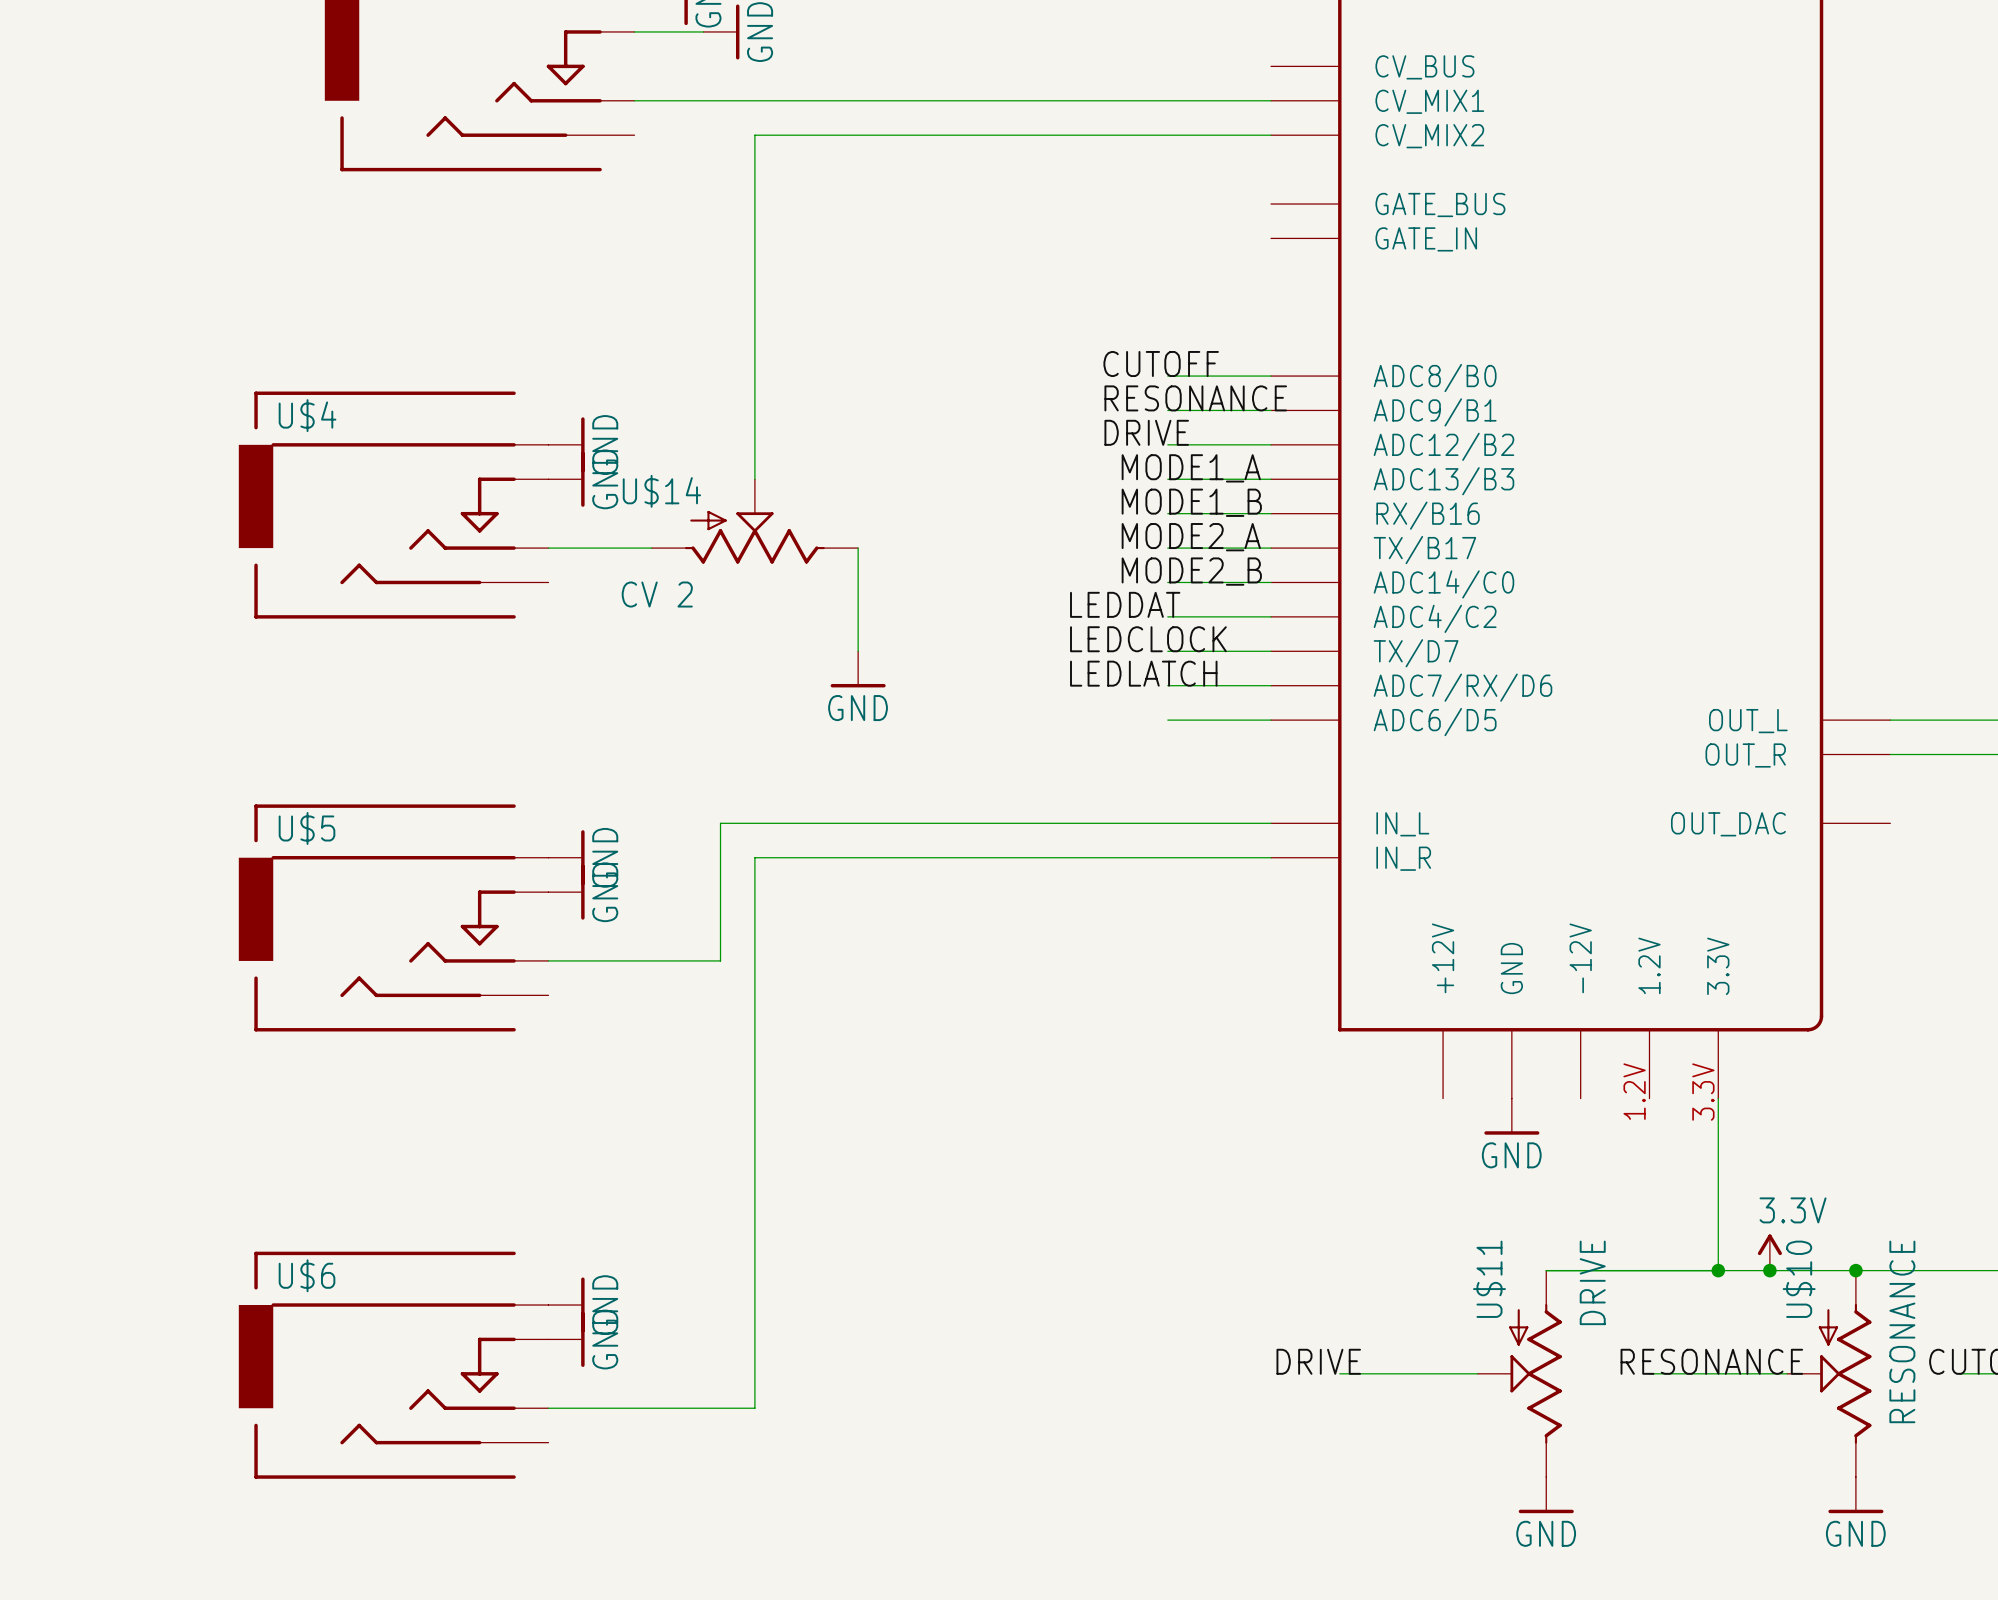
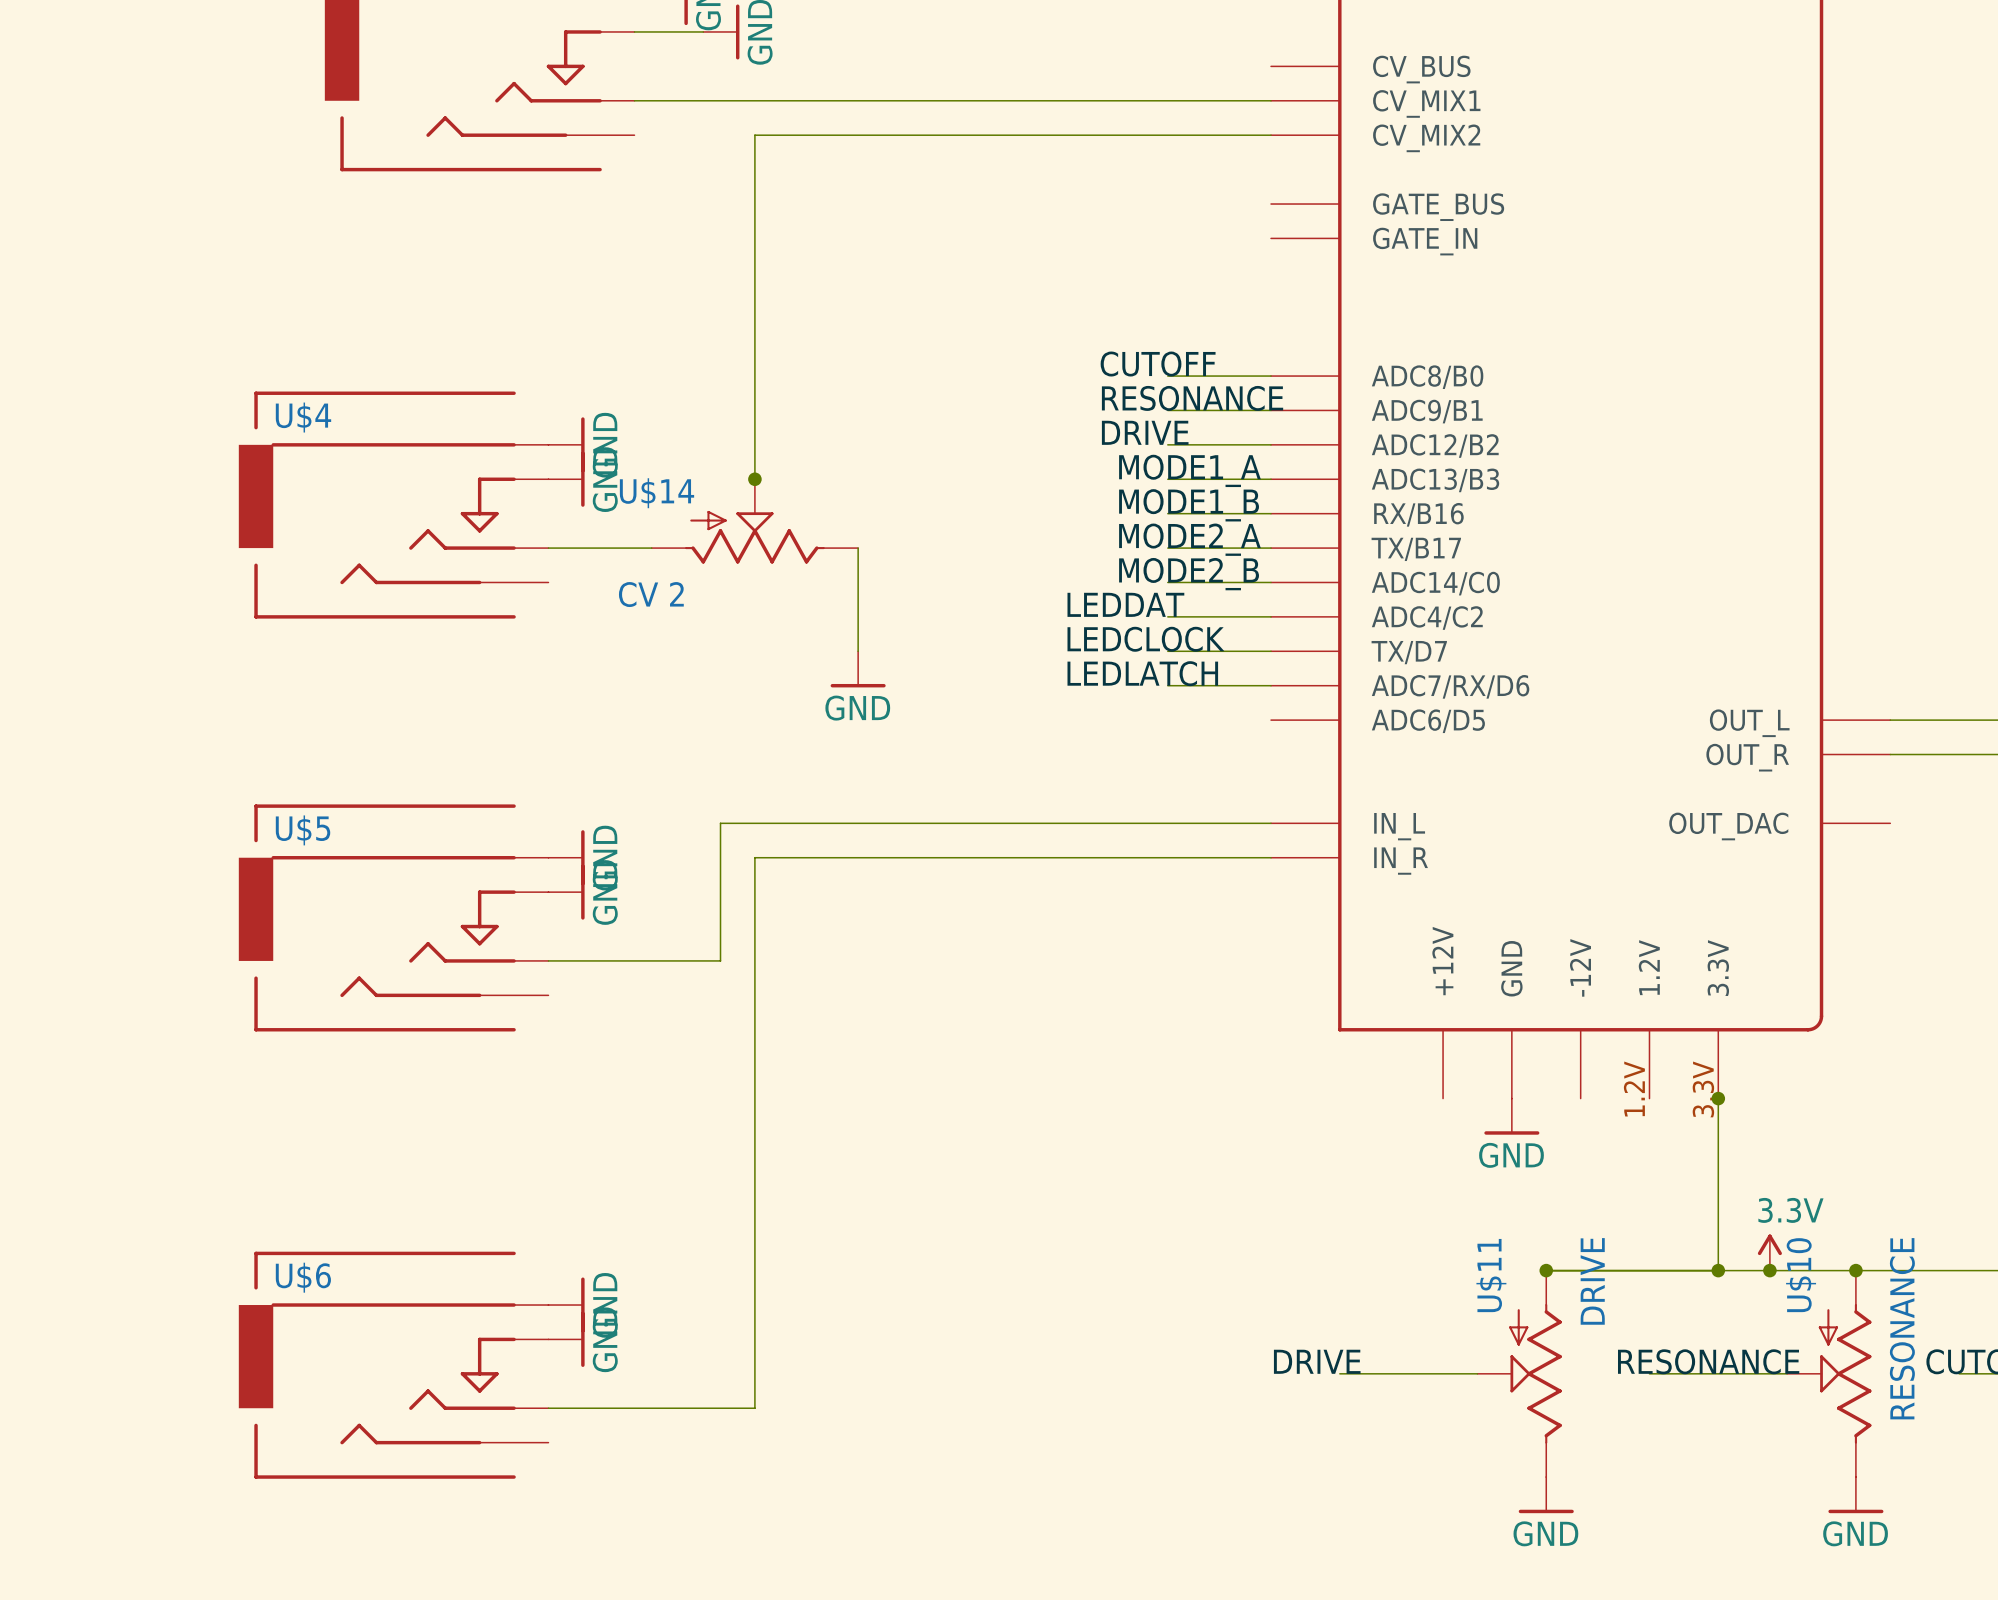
junction: none -> (754, 479)
wire: (1167, 720) (1271, 720) -> none
junction: none -> (1718, 1098)
junction: none -> (1546, 1270)

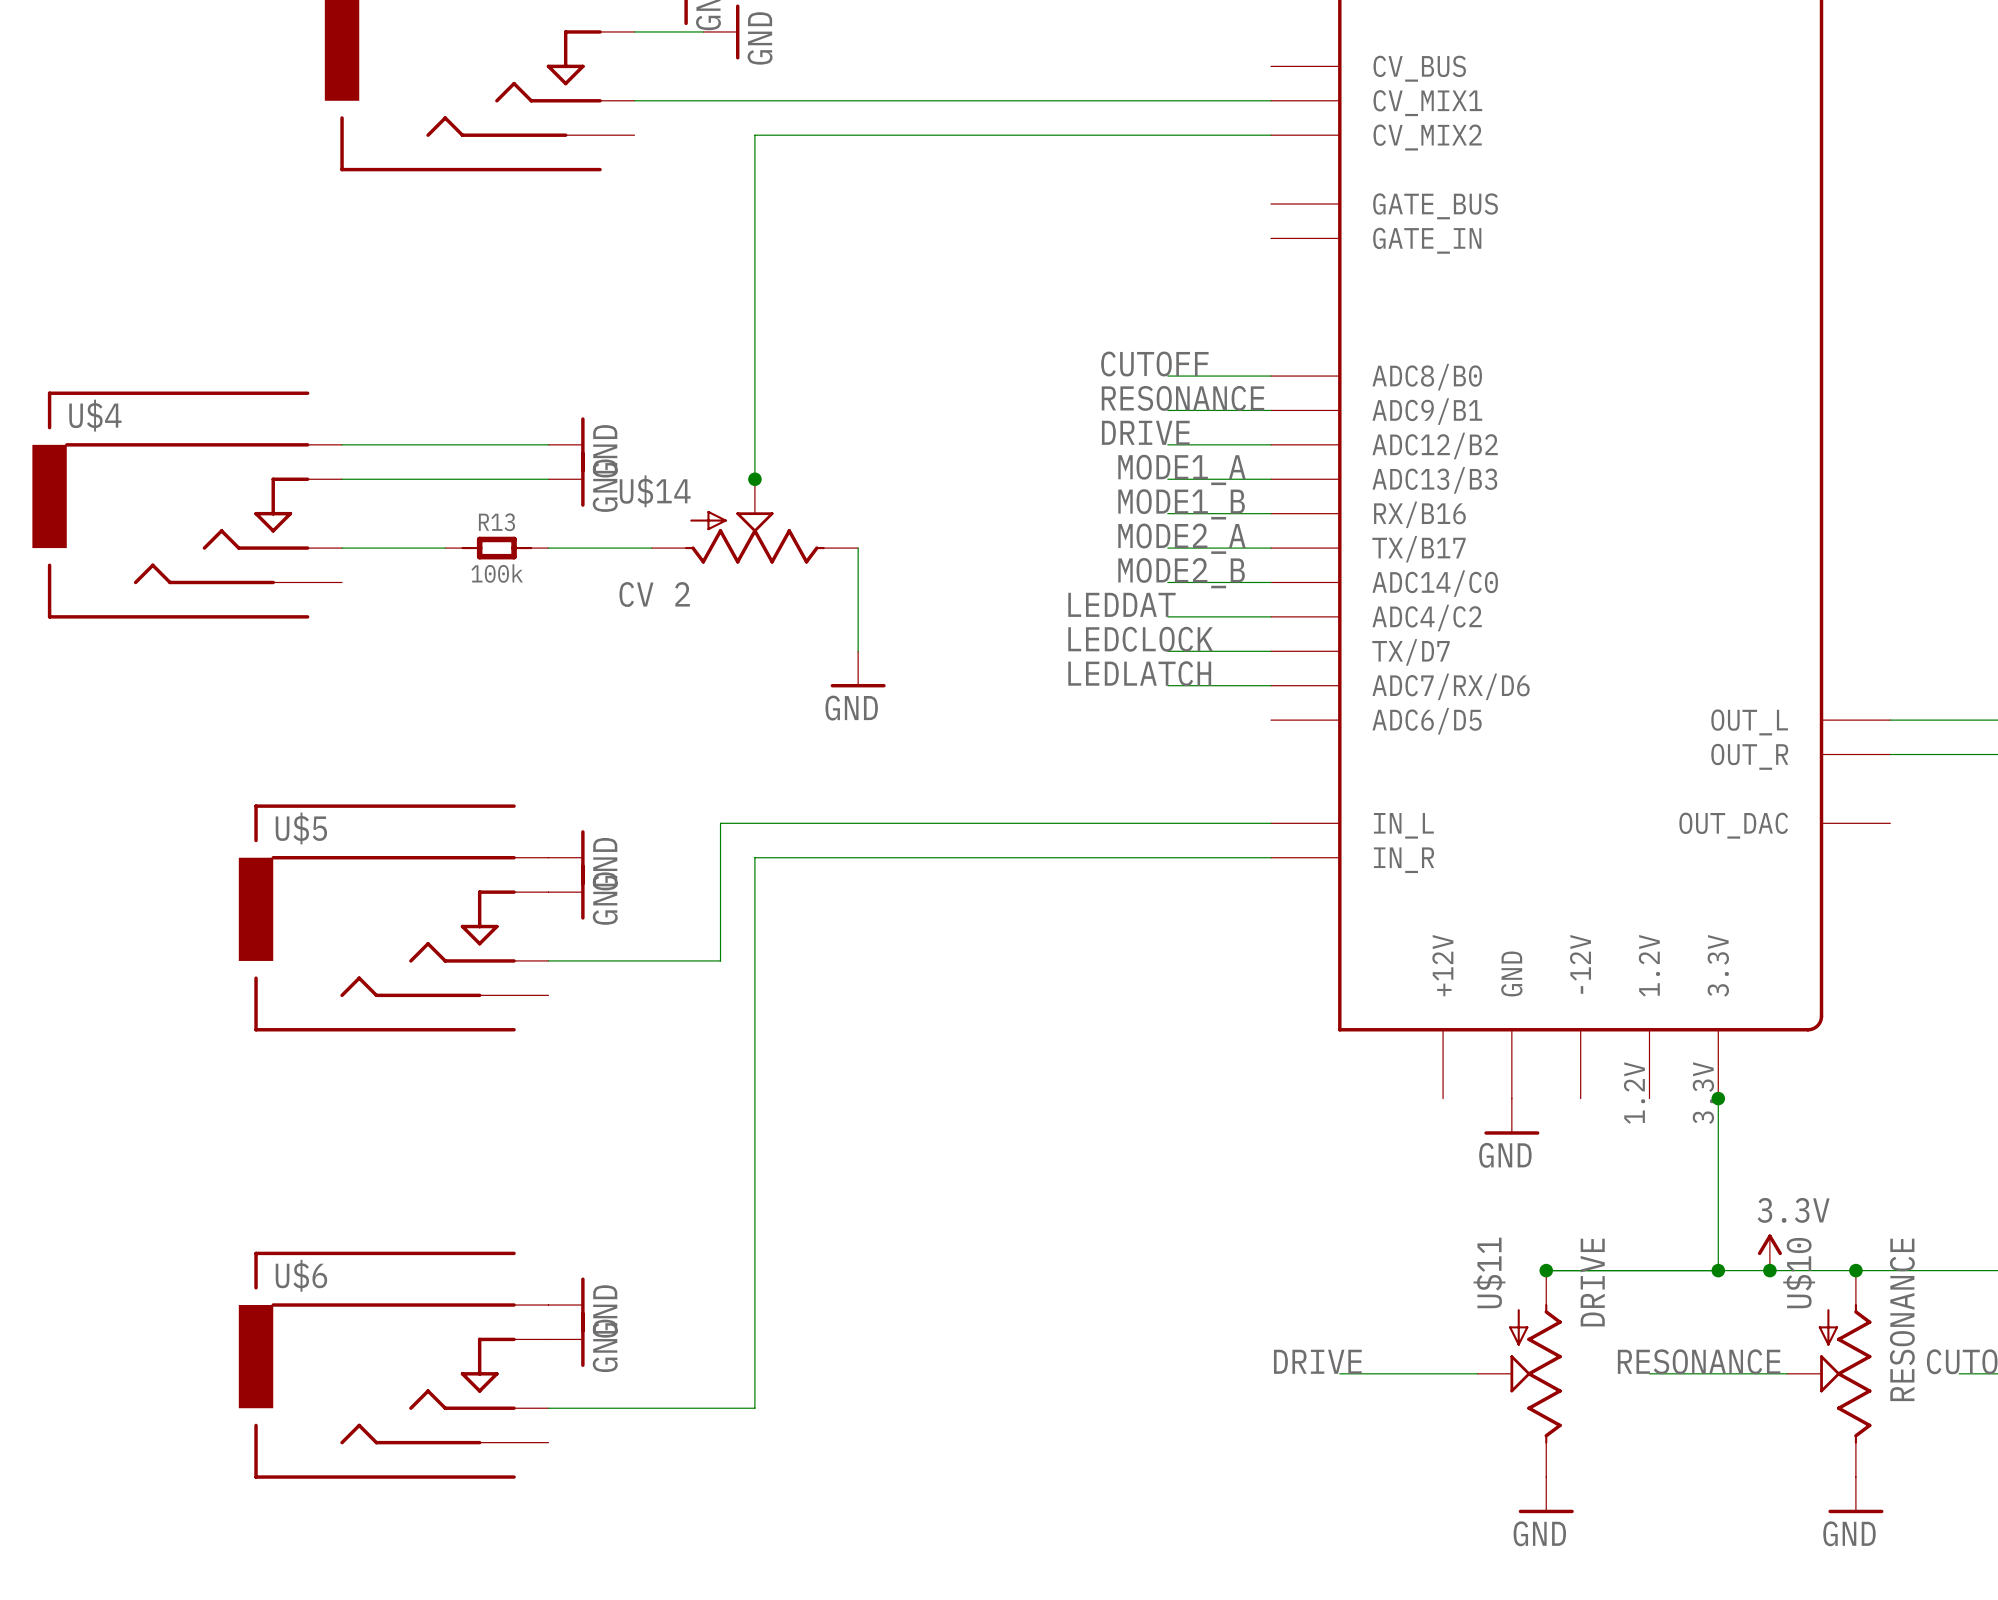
wire: none -> (342, 479) (548, 479)
U$4 position: (393, 505) -> (187, 505)
wire: none -> (342, 548) (445, 548)
R13: none -> 100k (496, 548)

